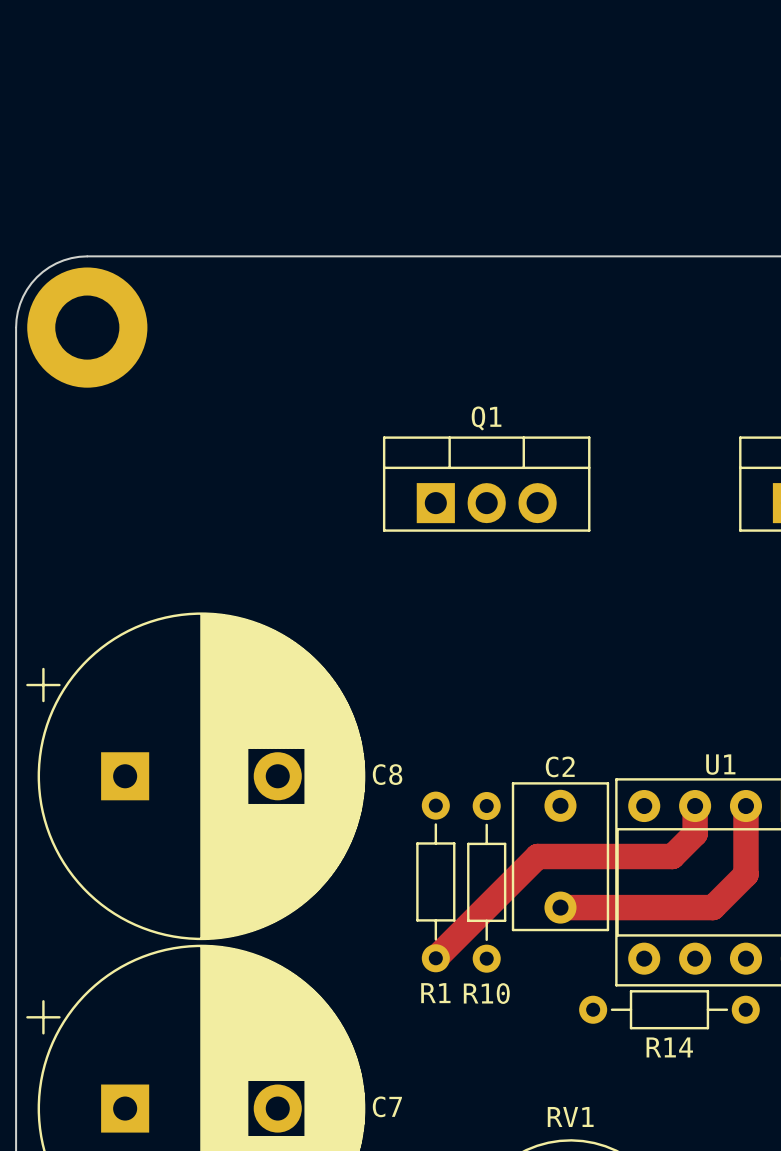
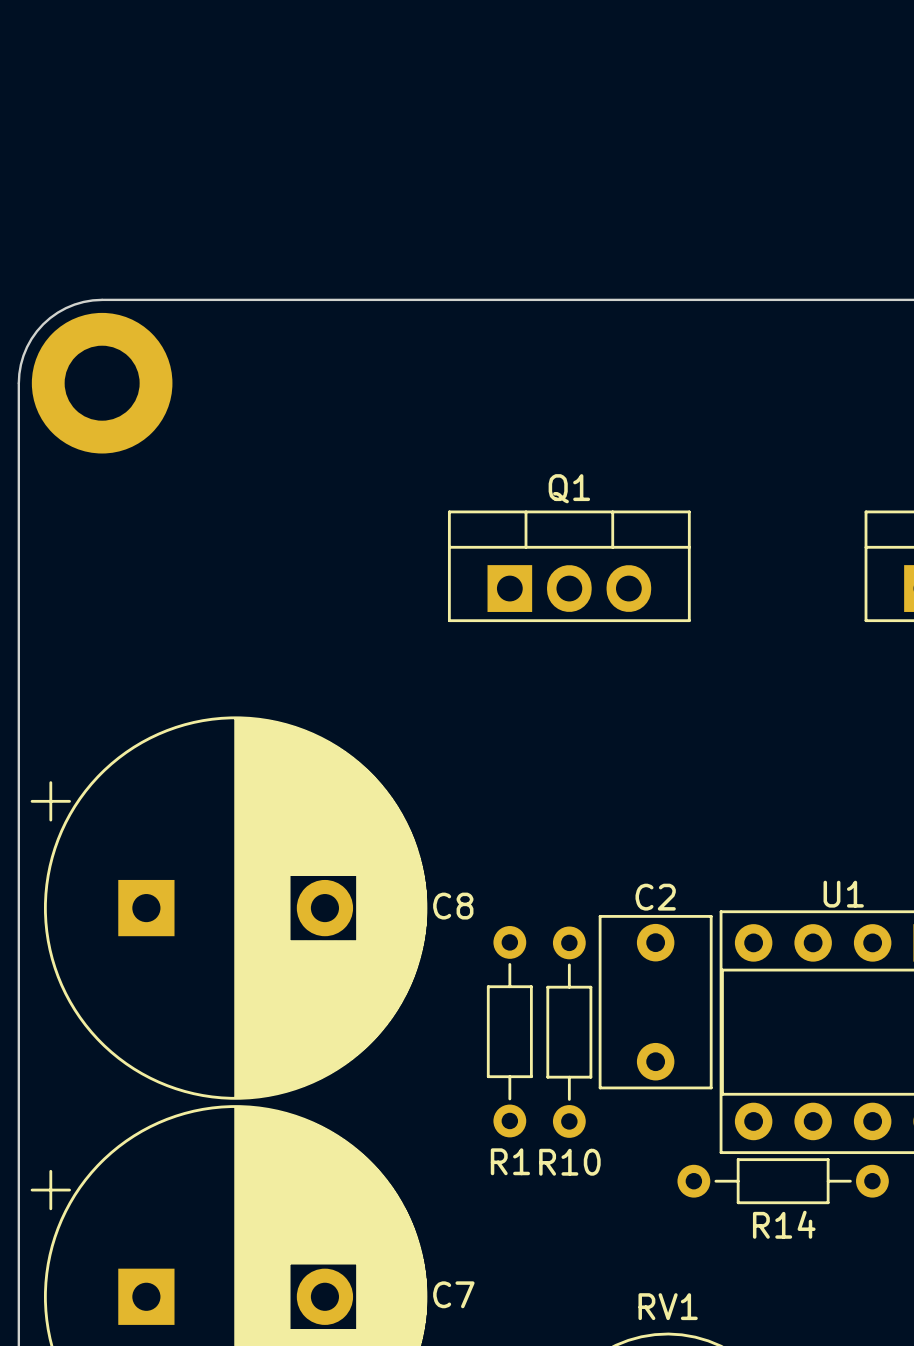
track: (695, 806) (695, 833) (672, 856) (537, 856) (435, 958) -> none
track: (745, 806) (745, 874) (712, 907) (560, 907) -> none

